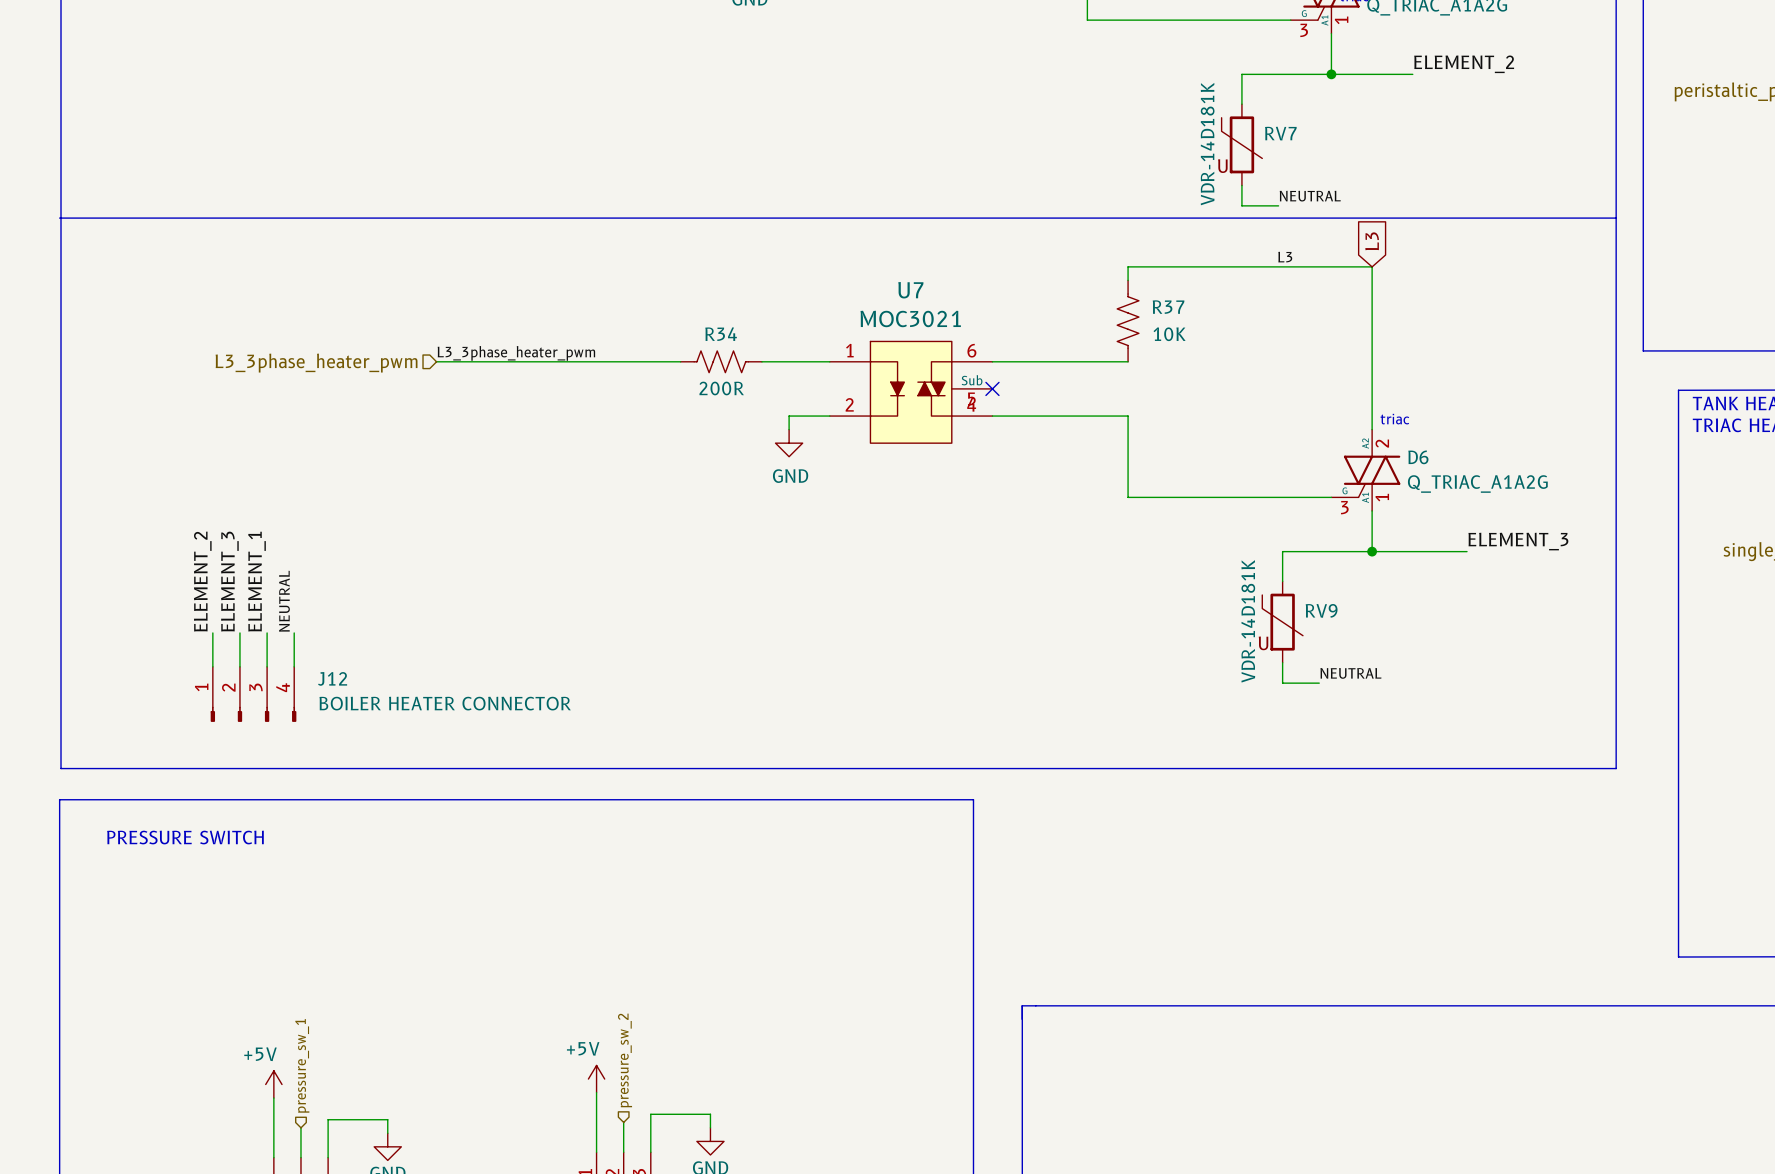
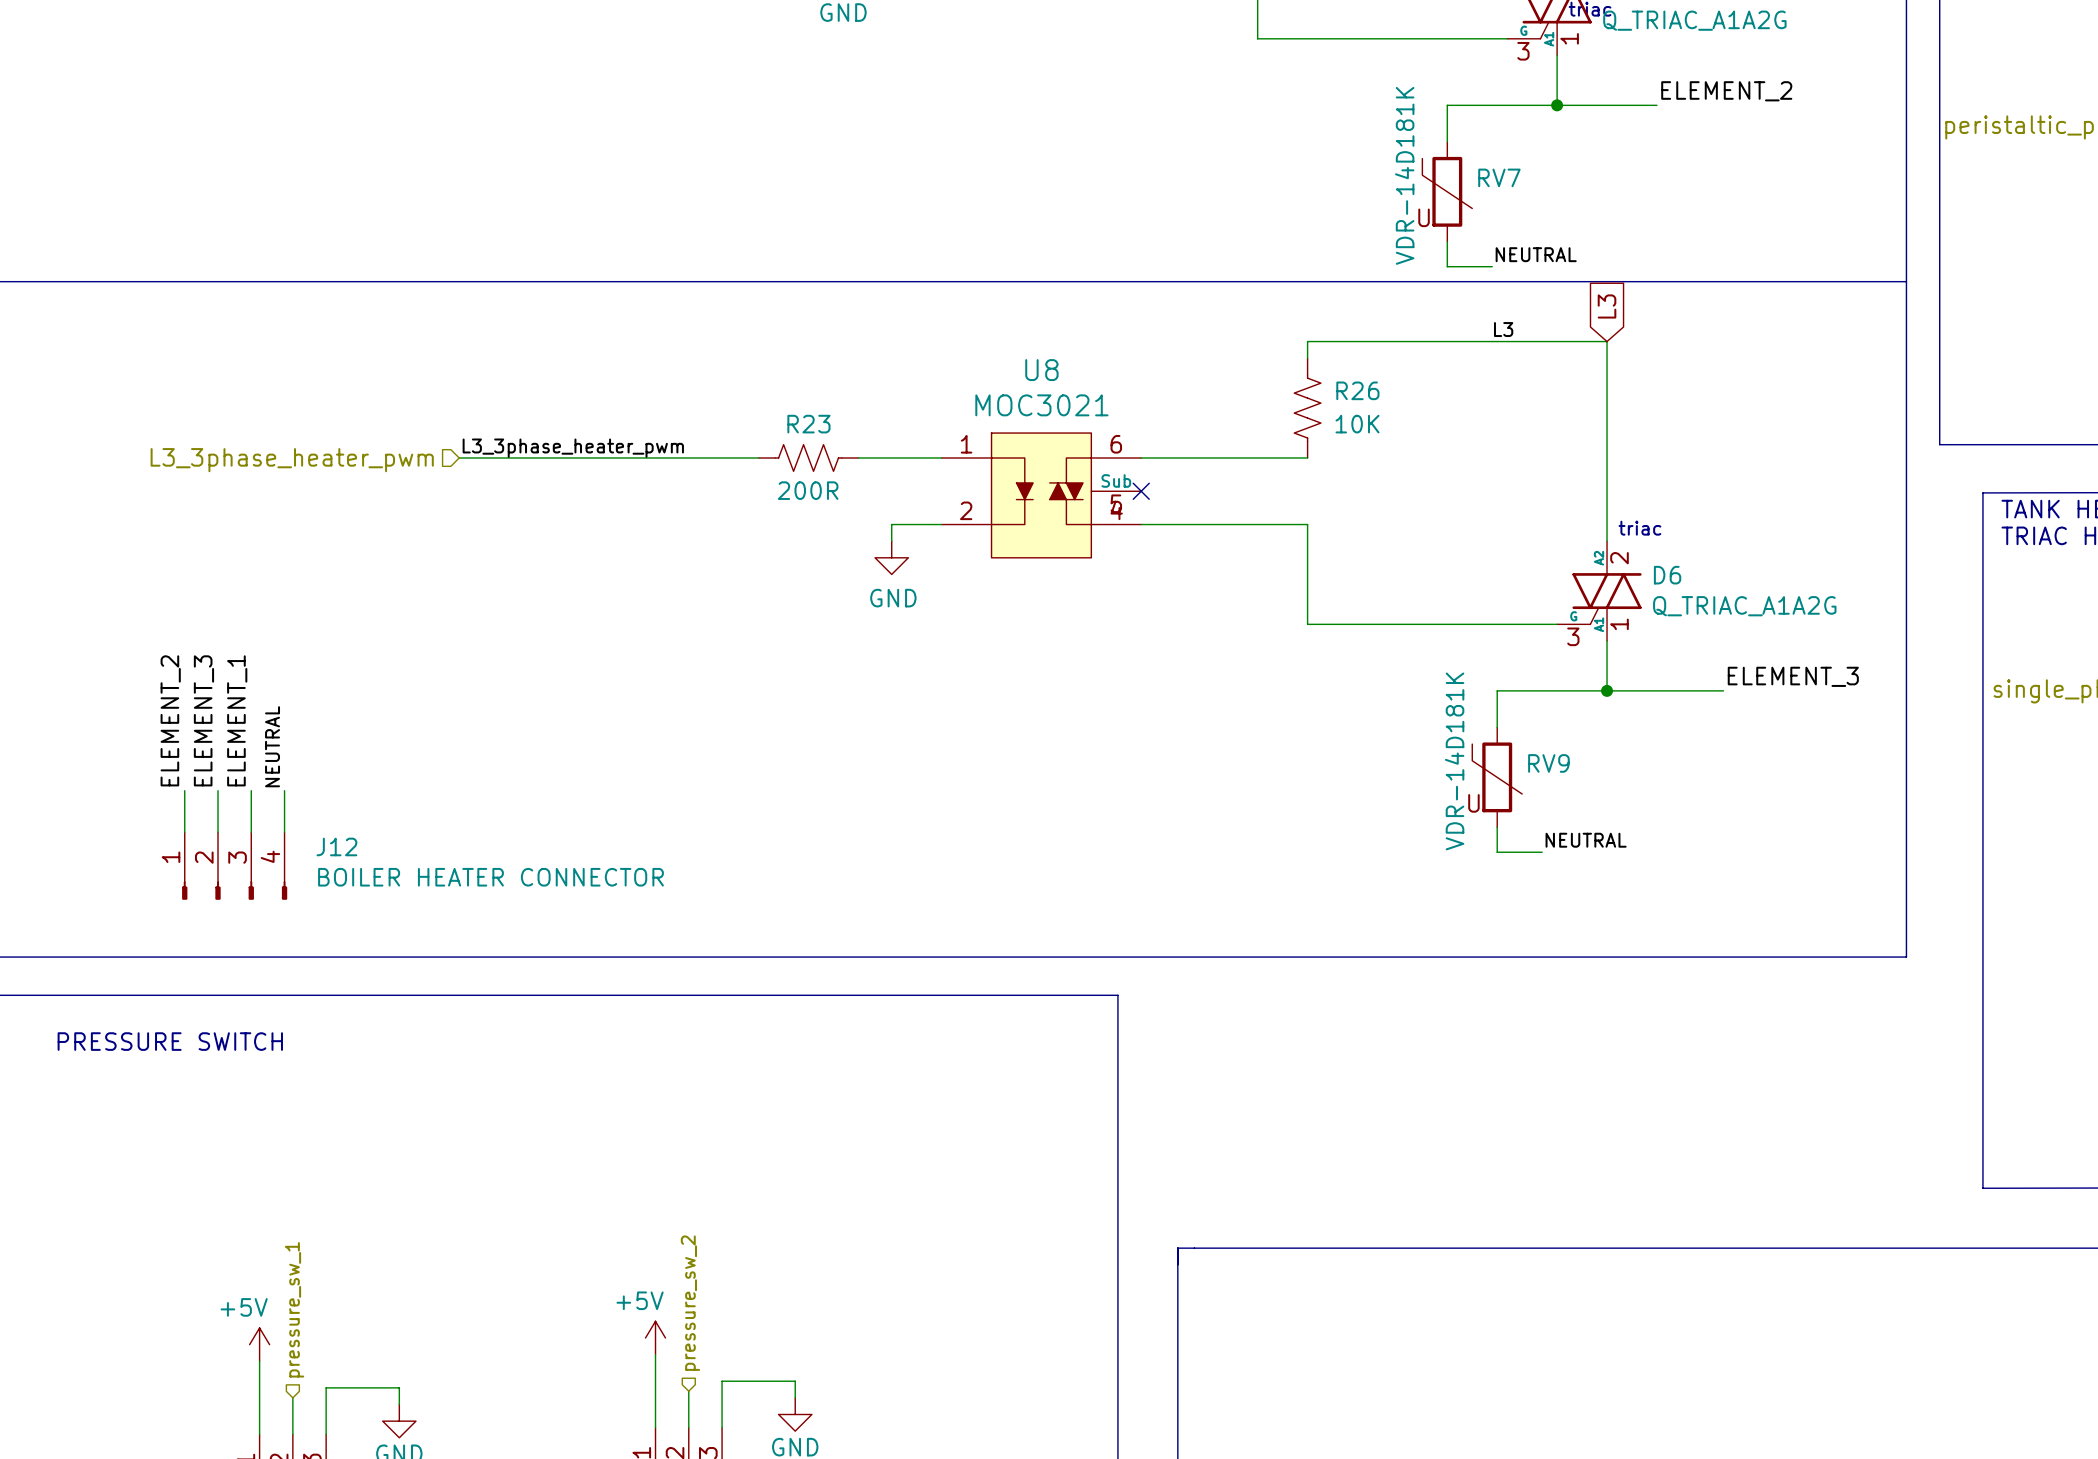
U7 name: U7 (910, 290) -> U8 (1041, 370)
R37 name: R37 (1168, 307) -> R26 (1357, 390)
R34 name: R34 (721, 334) -> R23 (808, 424)

